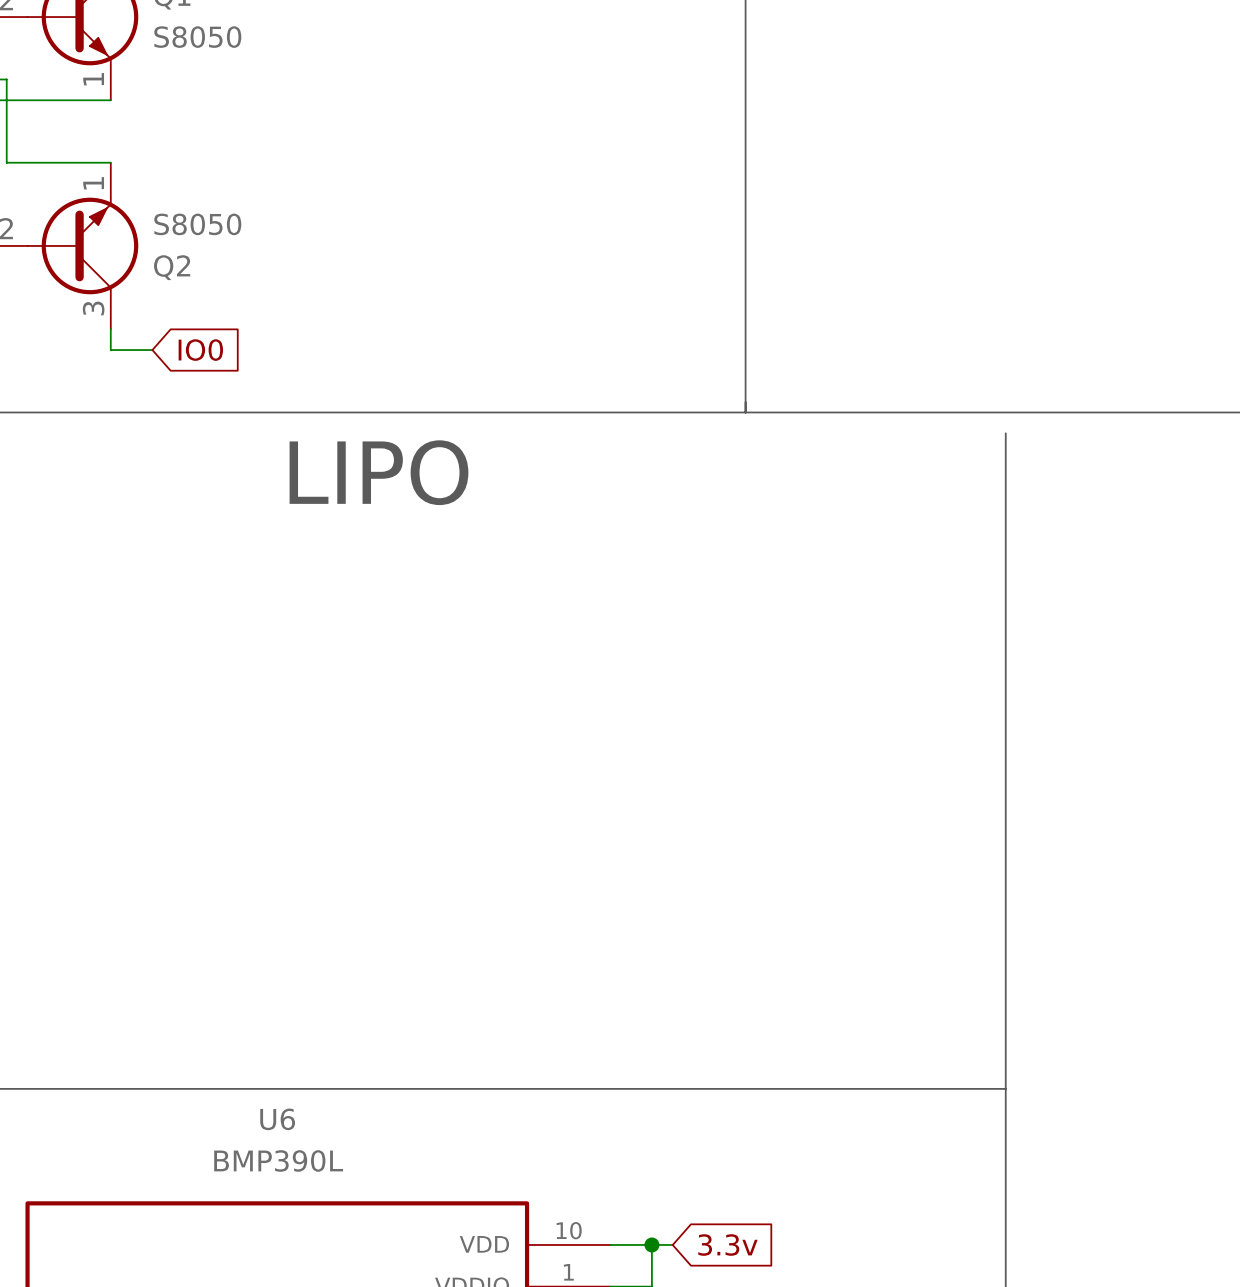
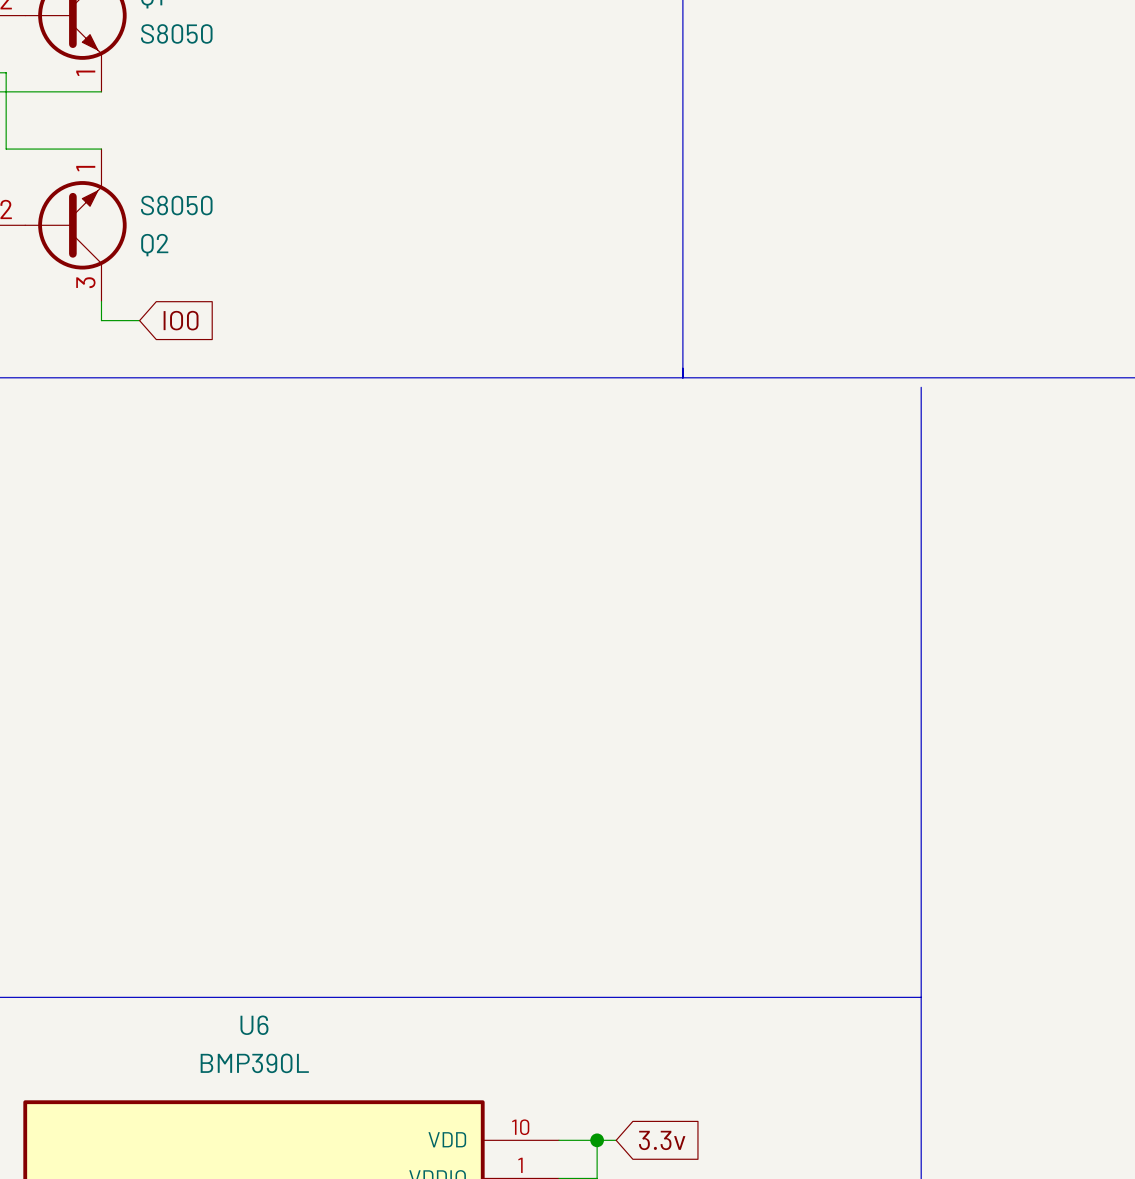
line: none -> (921, 387) (921, 396)
text: LIPO (378, 472) -> none

